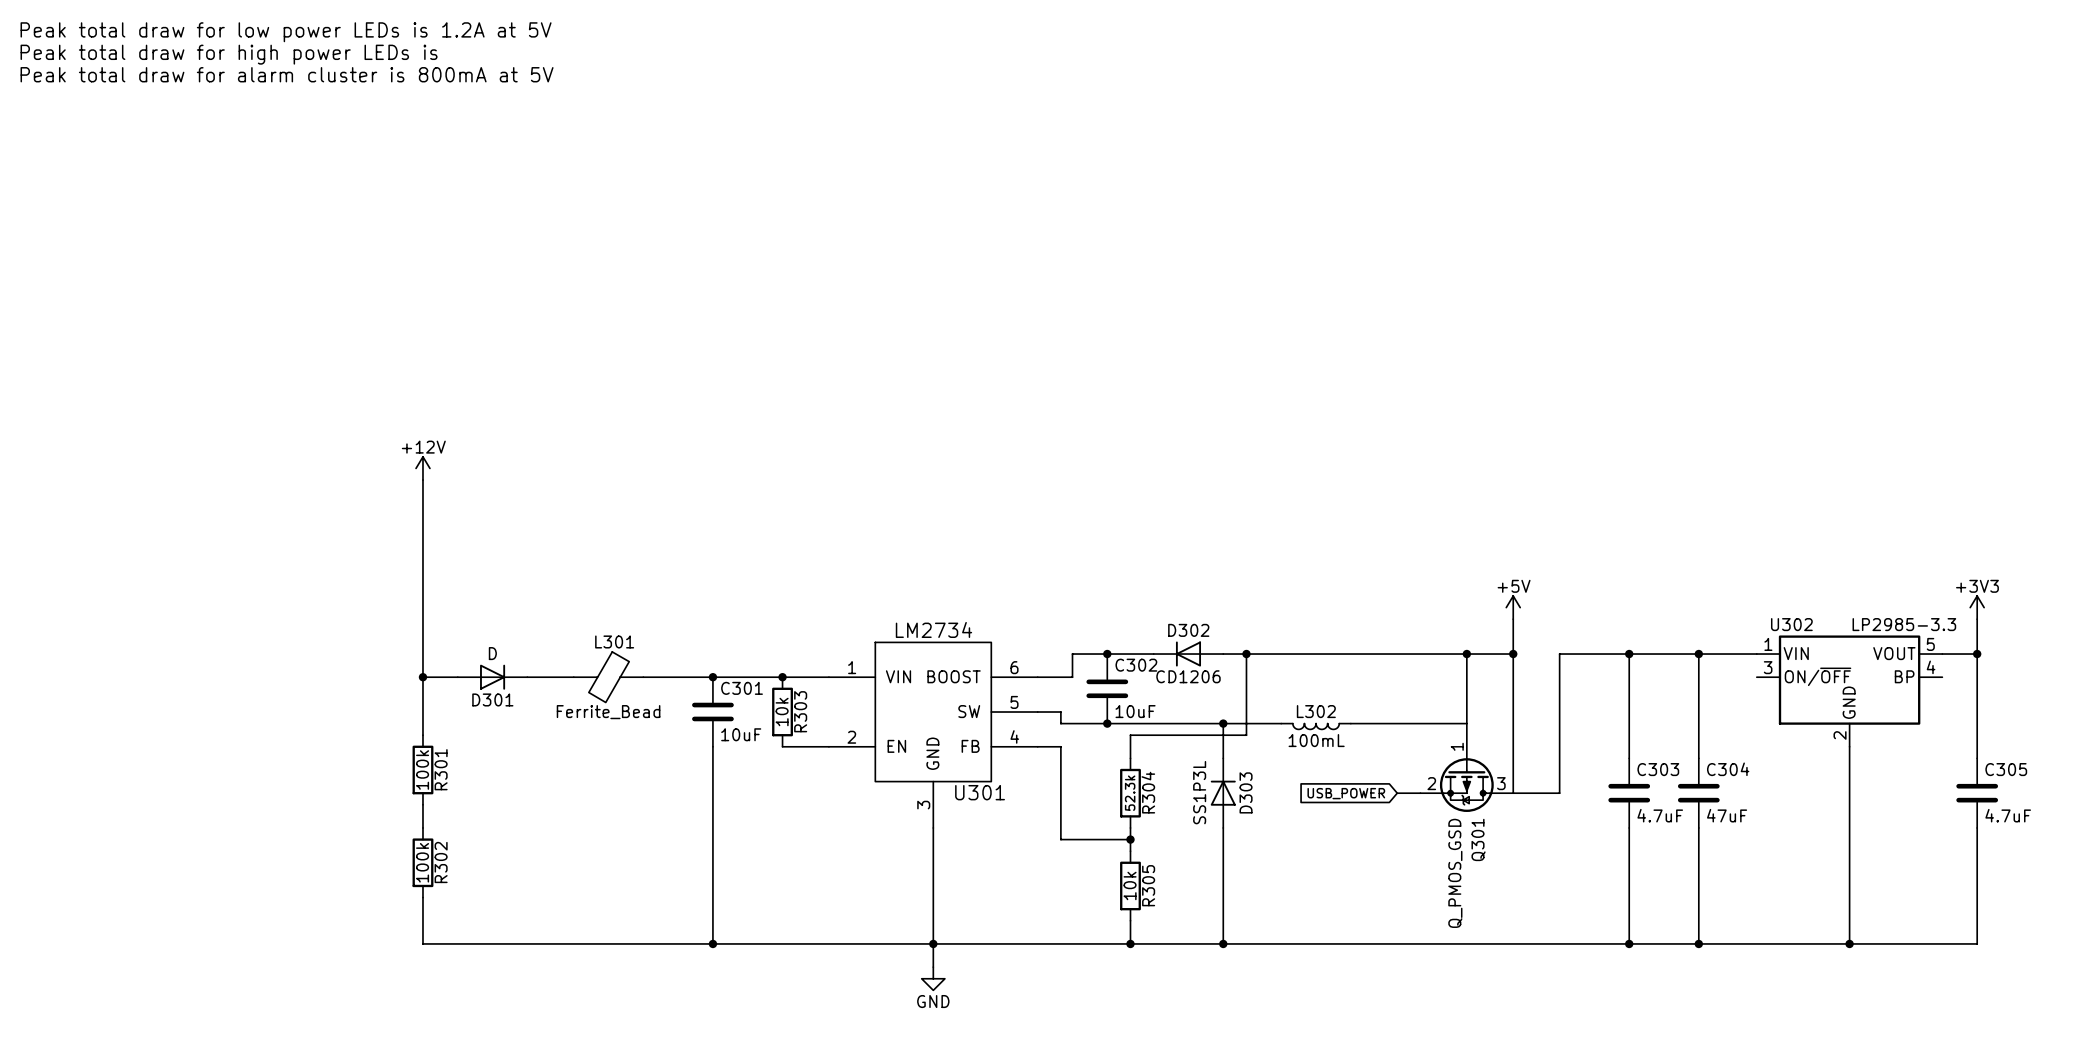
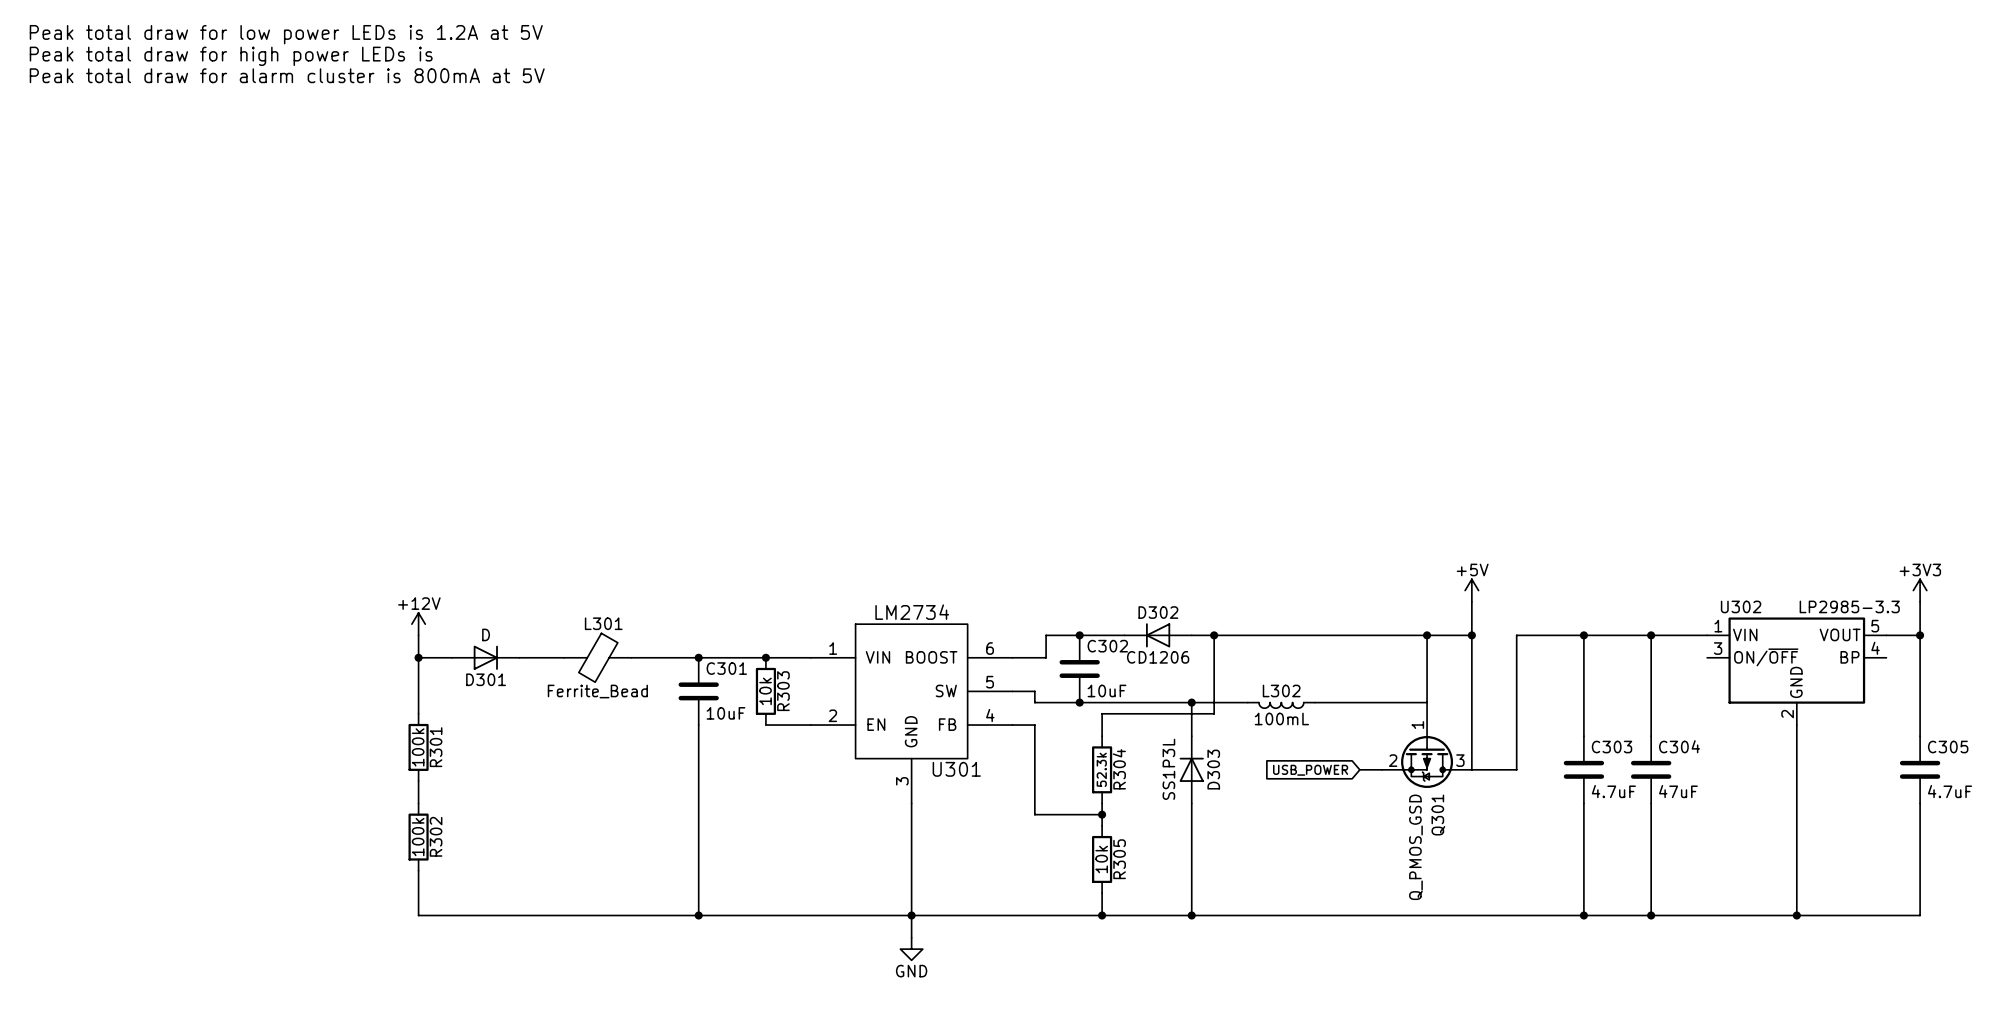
power symbol position: +12V (422, 468) -> +12V (418, 624)
wire: (422, 480) (422, 654) -> none

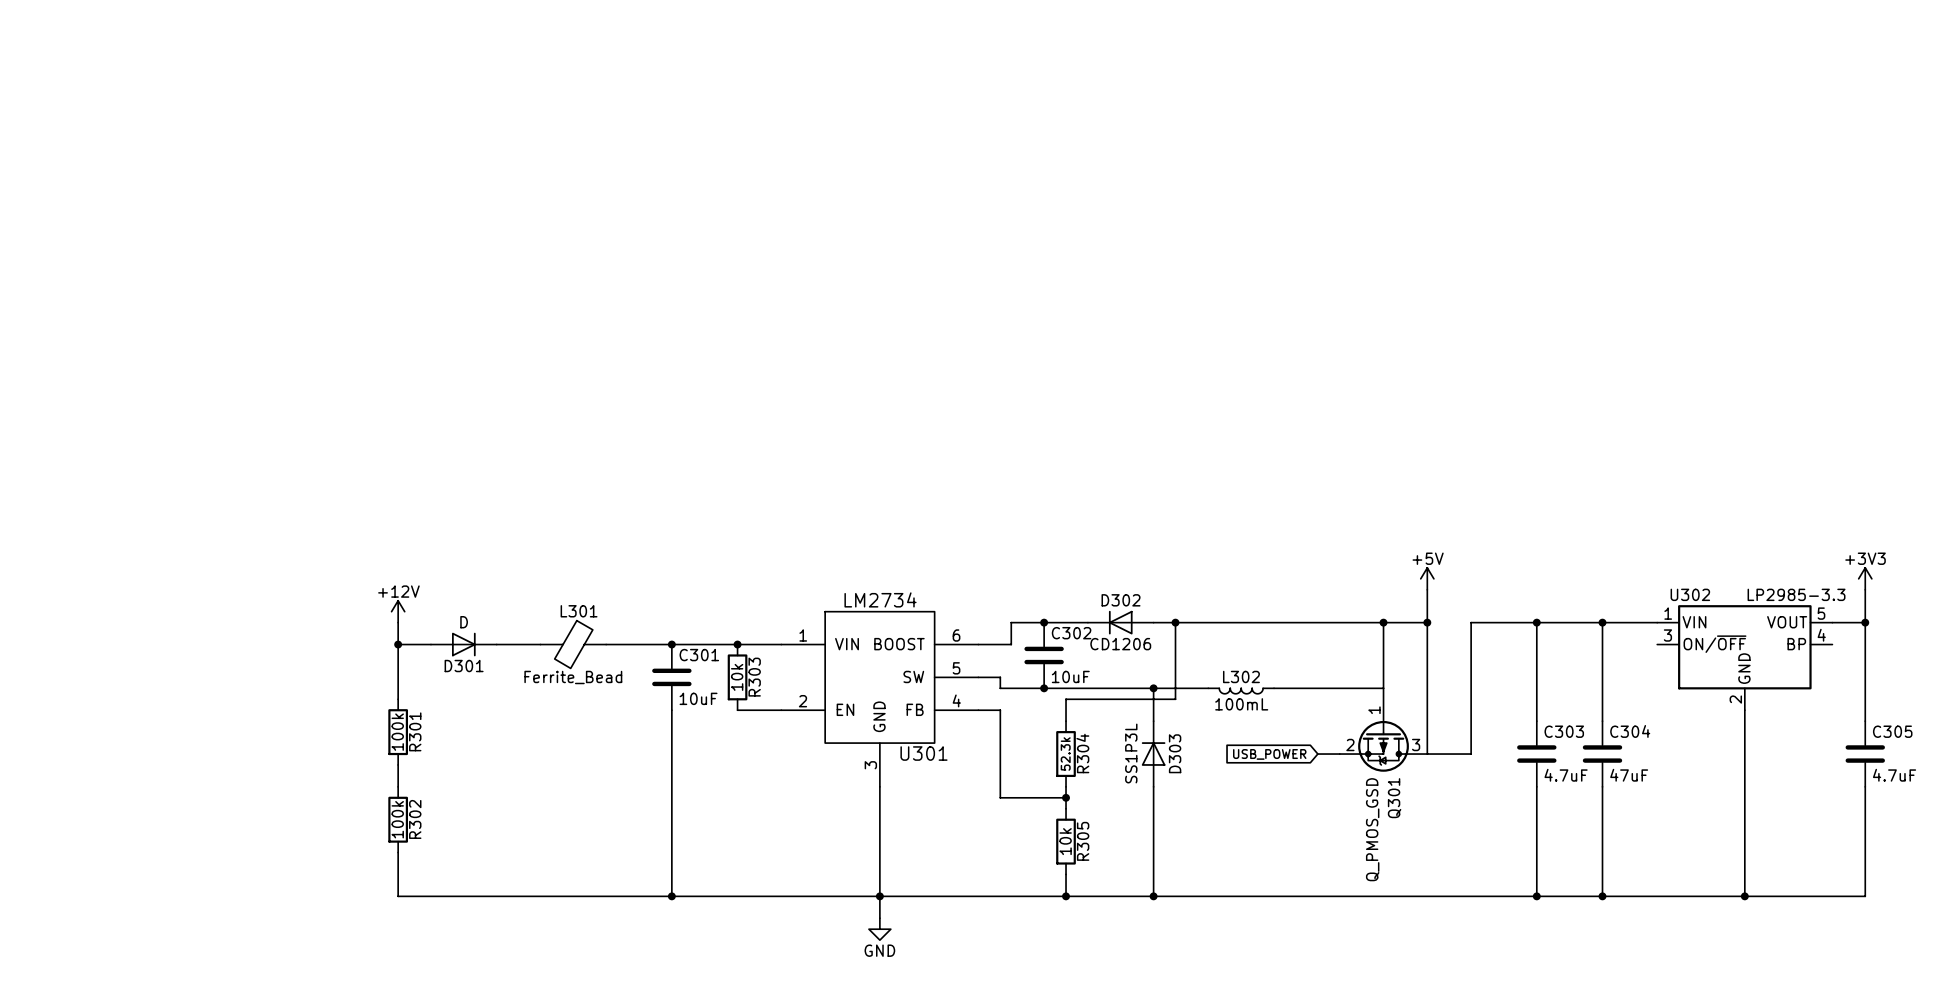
text: Peak total draw for low power LEDs is 1.2A at 5V (286, 34) -> none
text: Peak total draw for high power LEDs is (231, 56) -> none
text: Peak total draw for alarm cluster is 800mA at 5V (287, 75) -> none

